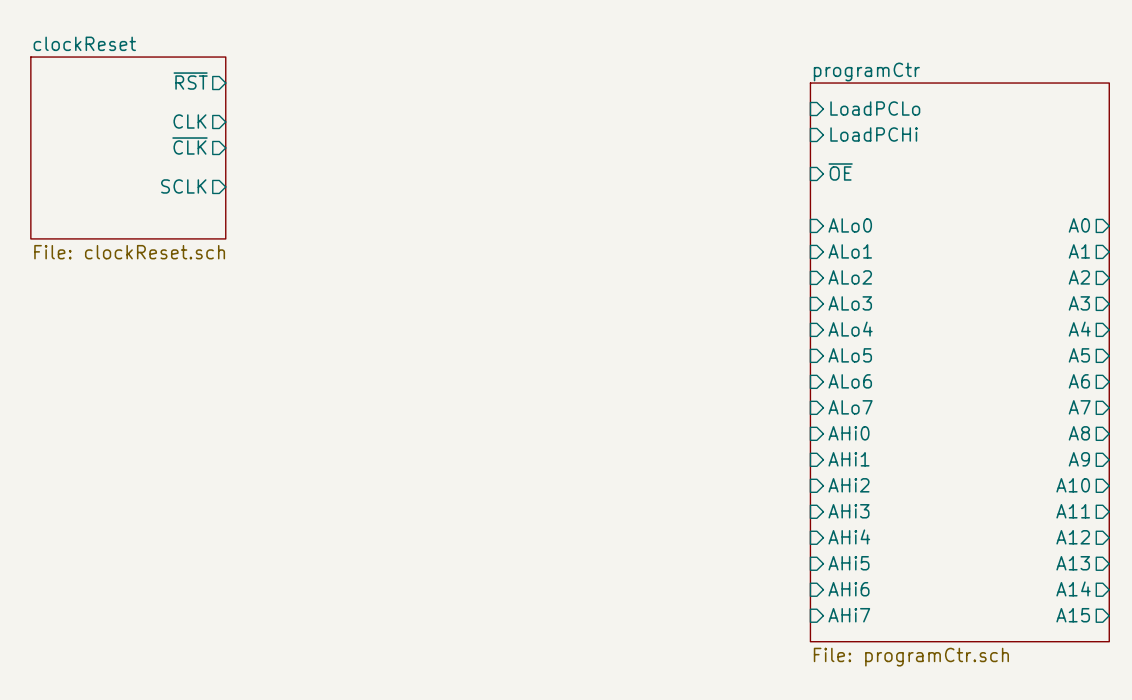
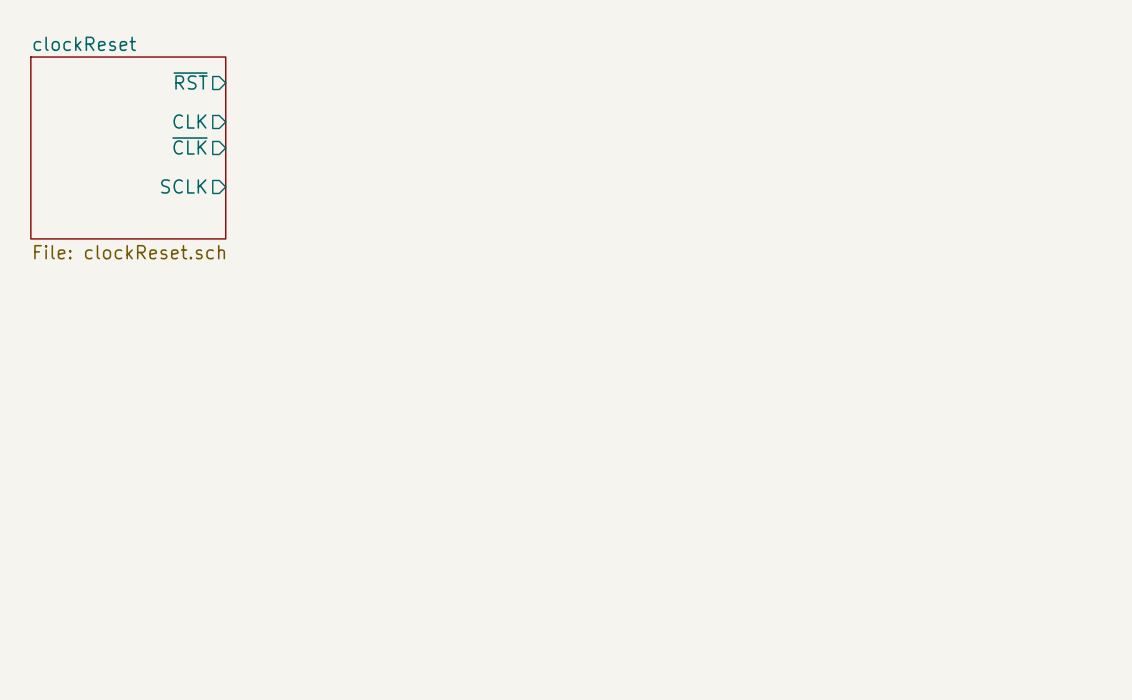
sheet pin: LoadPCLo (875, 108) -> none
sheet pin: LoadPCHi (874, 134) -> none
sheet pin: ~{OE} (840, 171) -> none
sheet pin: ALo0 (850, 225) -> none
sheet pin: A0 (1079, 225) -> none
sheet pin: ALo1 (850, 251) -> none
sheet pin: A1 (1079, 251) -> none
sheet pin: ALo2 (850, 277) -> none
sheet pin: A2 (1079, 277) -> none
sheet pin: ALo3 (850, 303) -> none
sheet pin: A3 (1079, 303) -> none
sheet pin: ALo4 (850, 329) -> none
sheet pin: A4 (1079, 329) -> none
sheet pin: ALo5 (850, 355) -> none
sheet pin: A5 (1079, 355) -> none
sheet programCtr: File: programCtr.sch (959, 362) -> none
sheet pin: ALo6 (850, 381) -> none
sheet pin: A6 (1079, 381) -> none
sheet pin: ALo7 (850, 407) -> none
sheet pin: A7 (1079, 407) -> none
sheet pin: AHi0 (849, 433) -> none
sheet pin: A8 (1079, 433) -> none
sheet pin: AHi1 (849, 459) -> none
sheet pin: A9 (1079, 459) -> none
sheet pin: AHi2 (849, 485) -> none
sheet pin: A10 (1073, 485) -> none
sheet pin: AHi3 (849, 511) -> none
sheet pin: A11 (1073, 511) -> none
sheet pin: AHi4 (849, 536) -> none
sheet pin: A12 (1073, 537) -> none
sheet pin: AHi5 (849, 563) -> none
sheet pin: A13 (1073, 563) -> none
sheet pin: A14 (1073, 588) -> none
sheet pin: AHi6 (849, 589) -> none
sheet pin: AHi7 (849, 615) -> none
sheet pin: A15 (1073, 615) -> none

